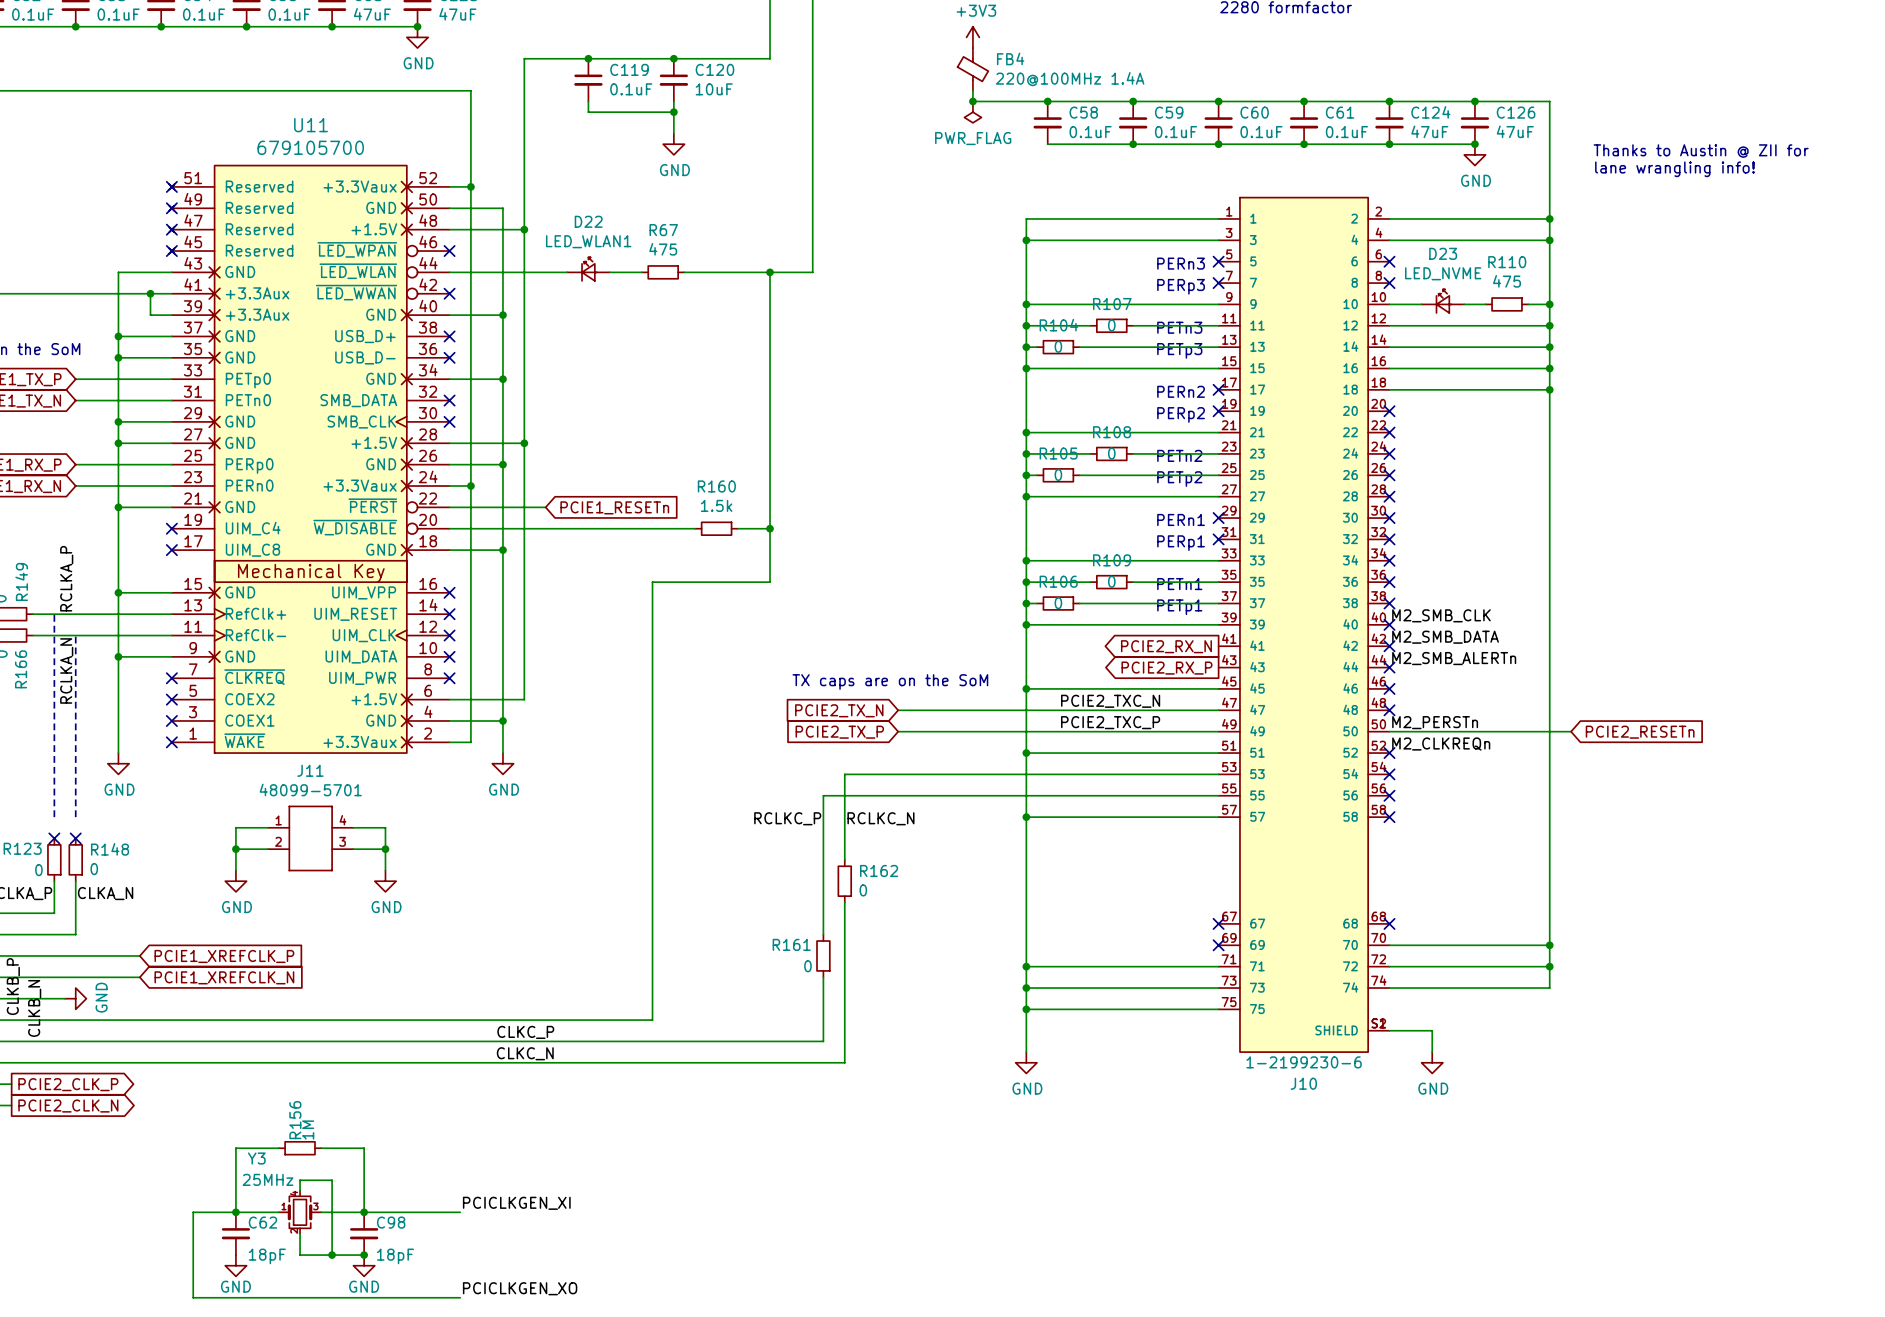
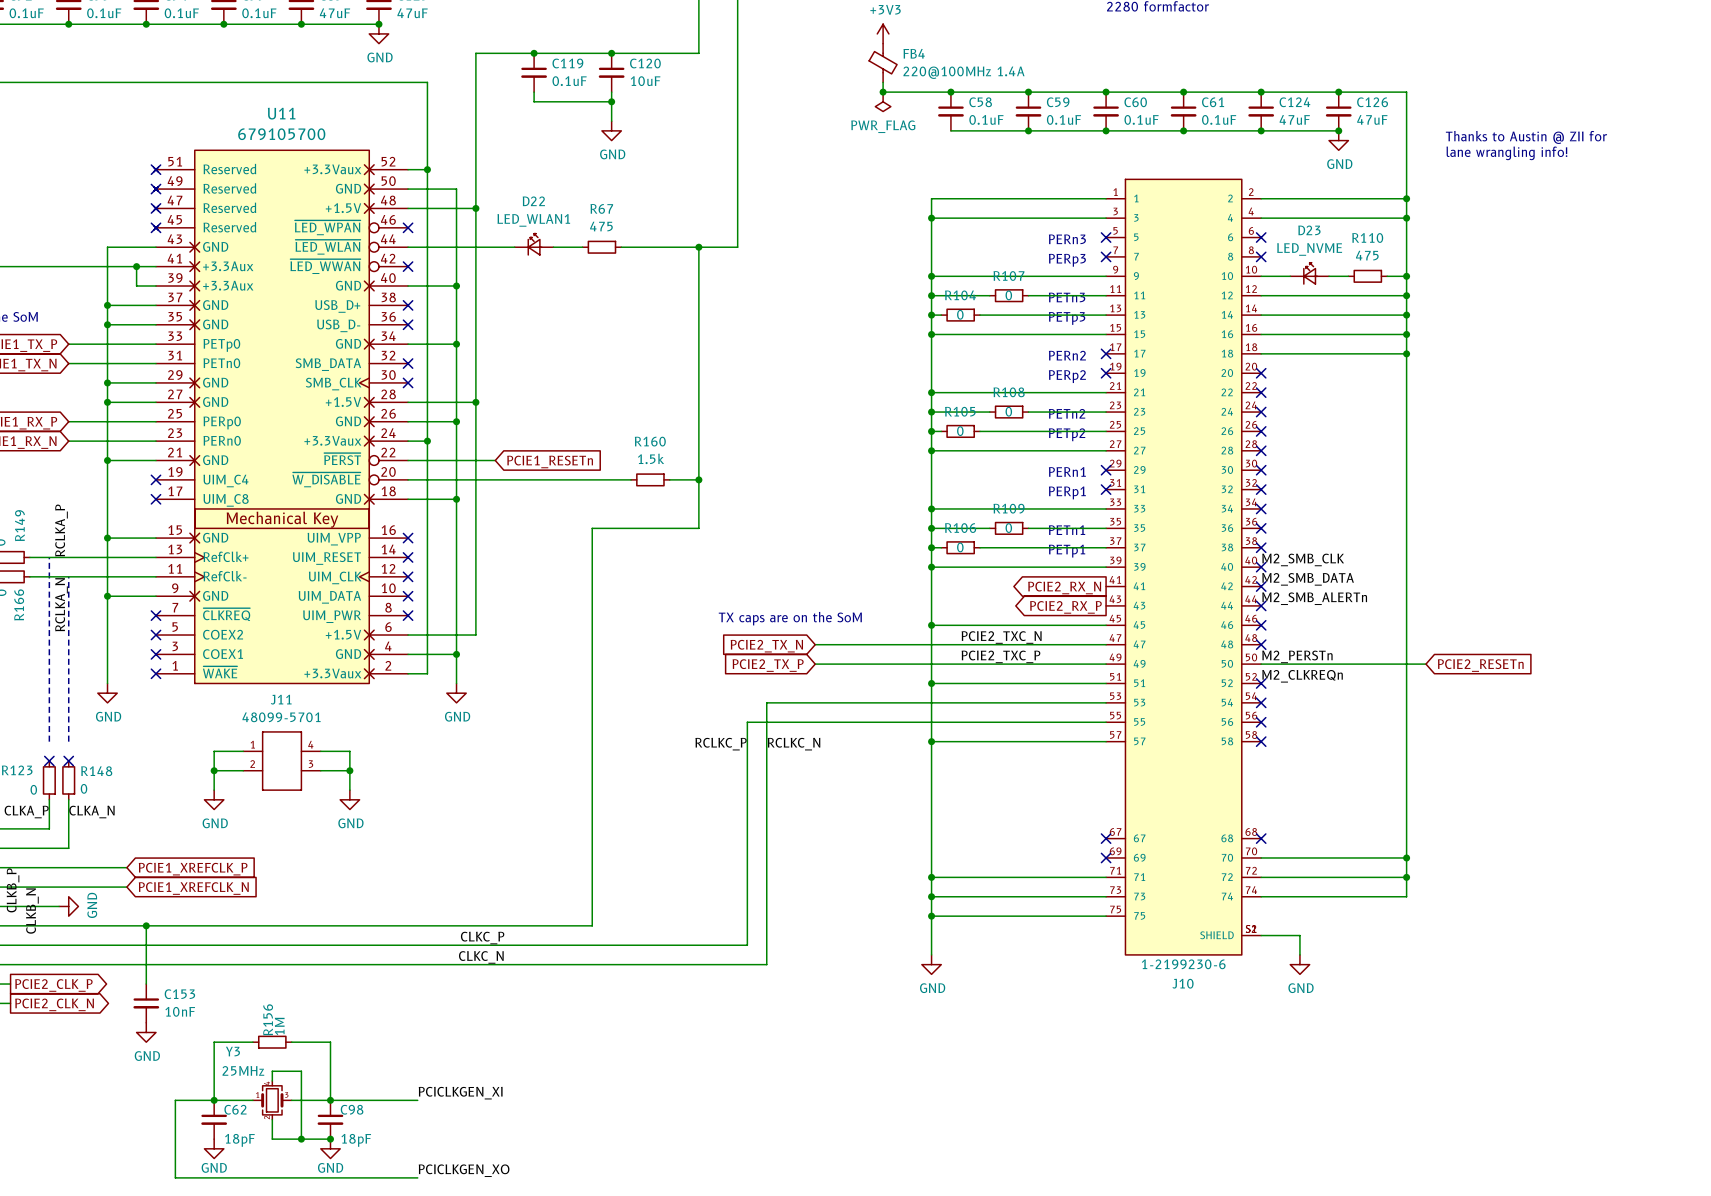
wire: none -> (766, 780) (766, 819)
R162: 0 (844, 881) -> none
wire: none -> (747, 848) (747, 887)
R161: 0 (823, 955) -> none
wire: none -> (146, 925) (146, 984)
junction: none -> (146, 925)
C153: none -> 10nF (146, 1003)
power symbol: none -> GND (146, 1032)

